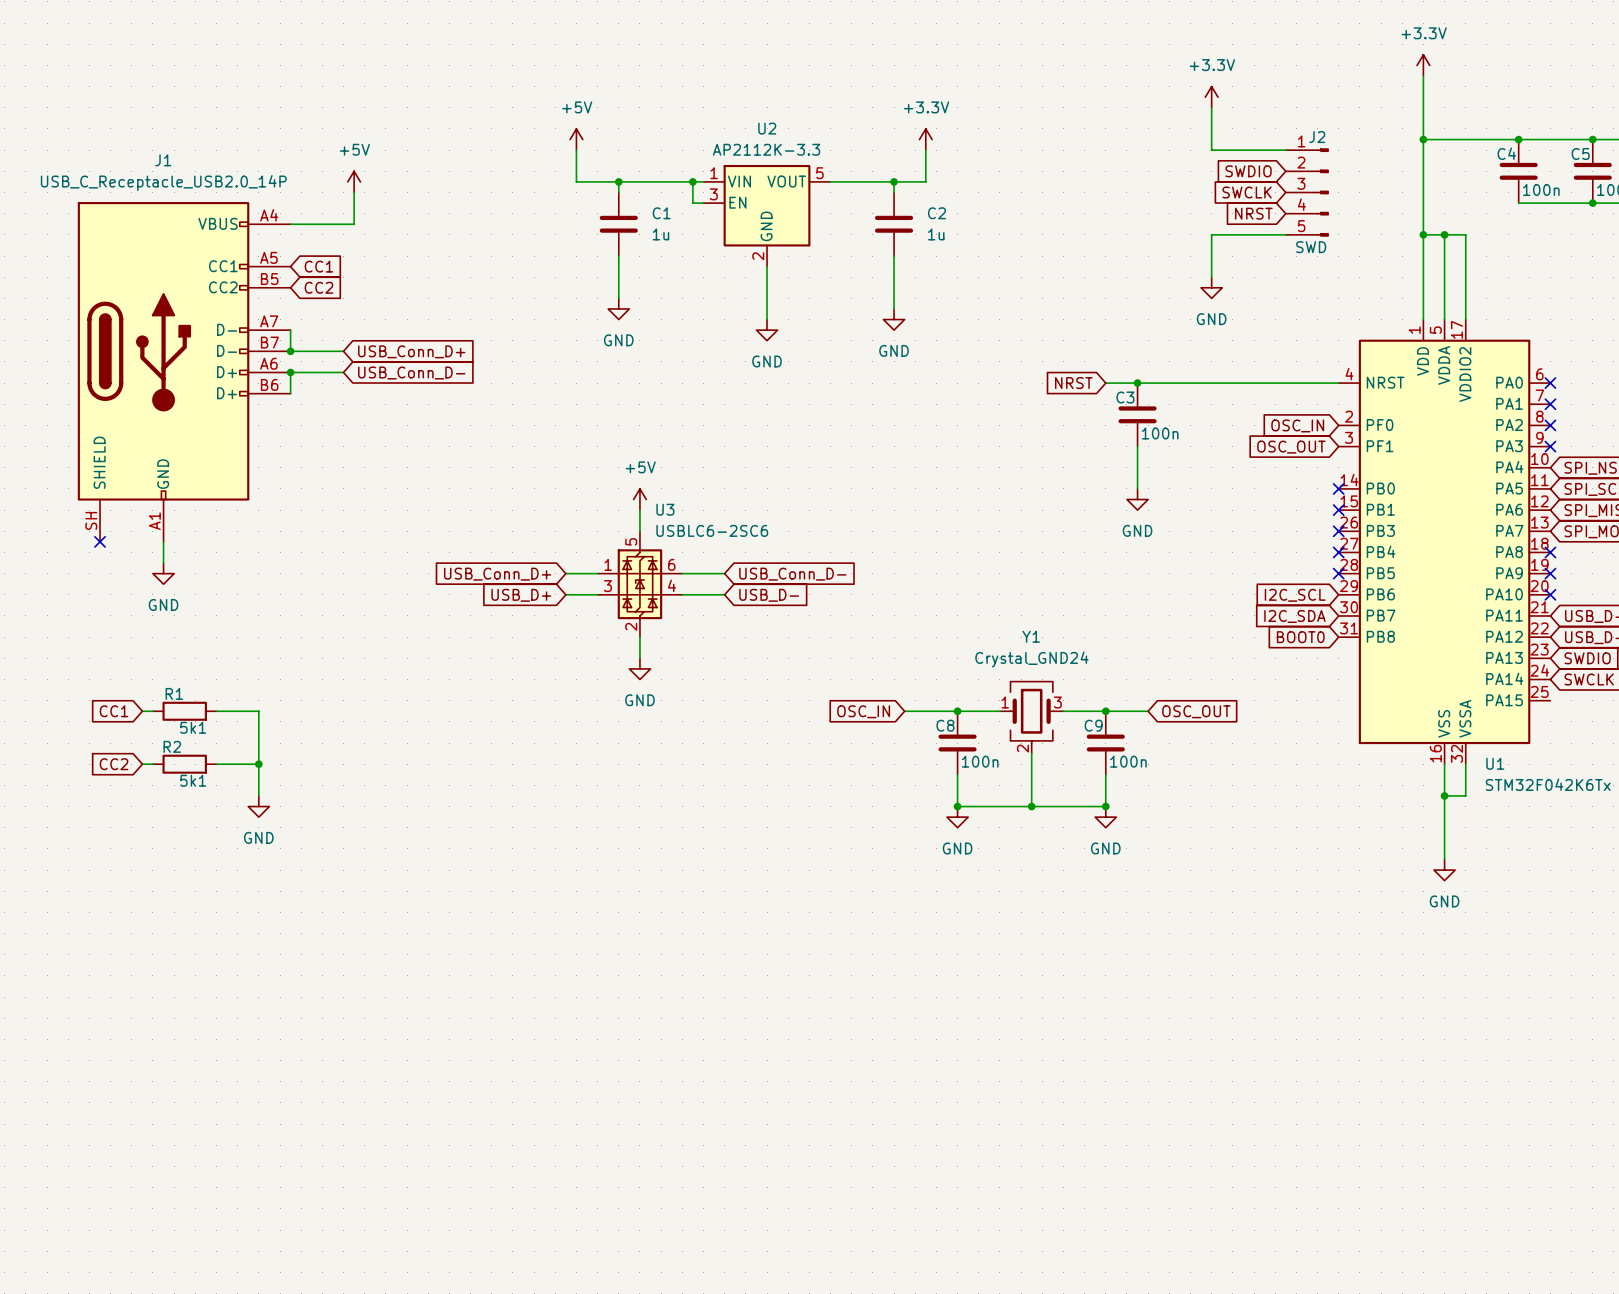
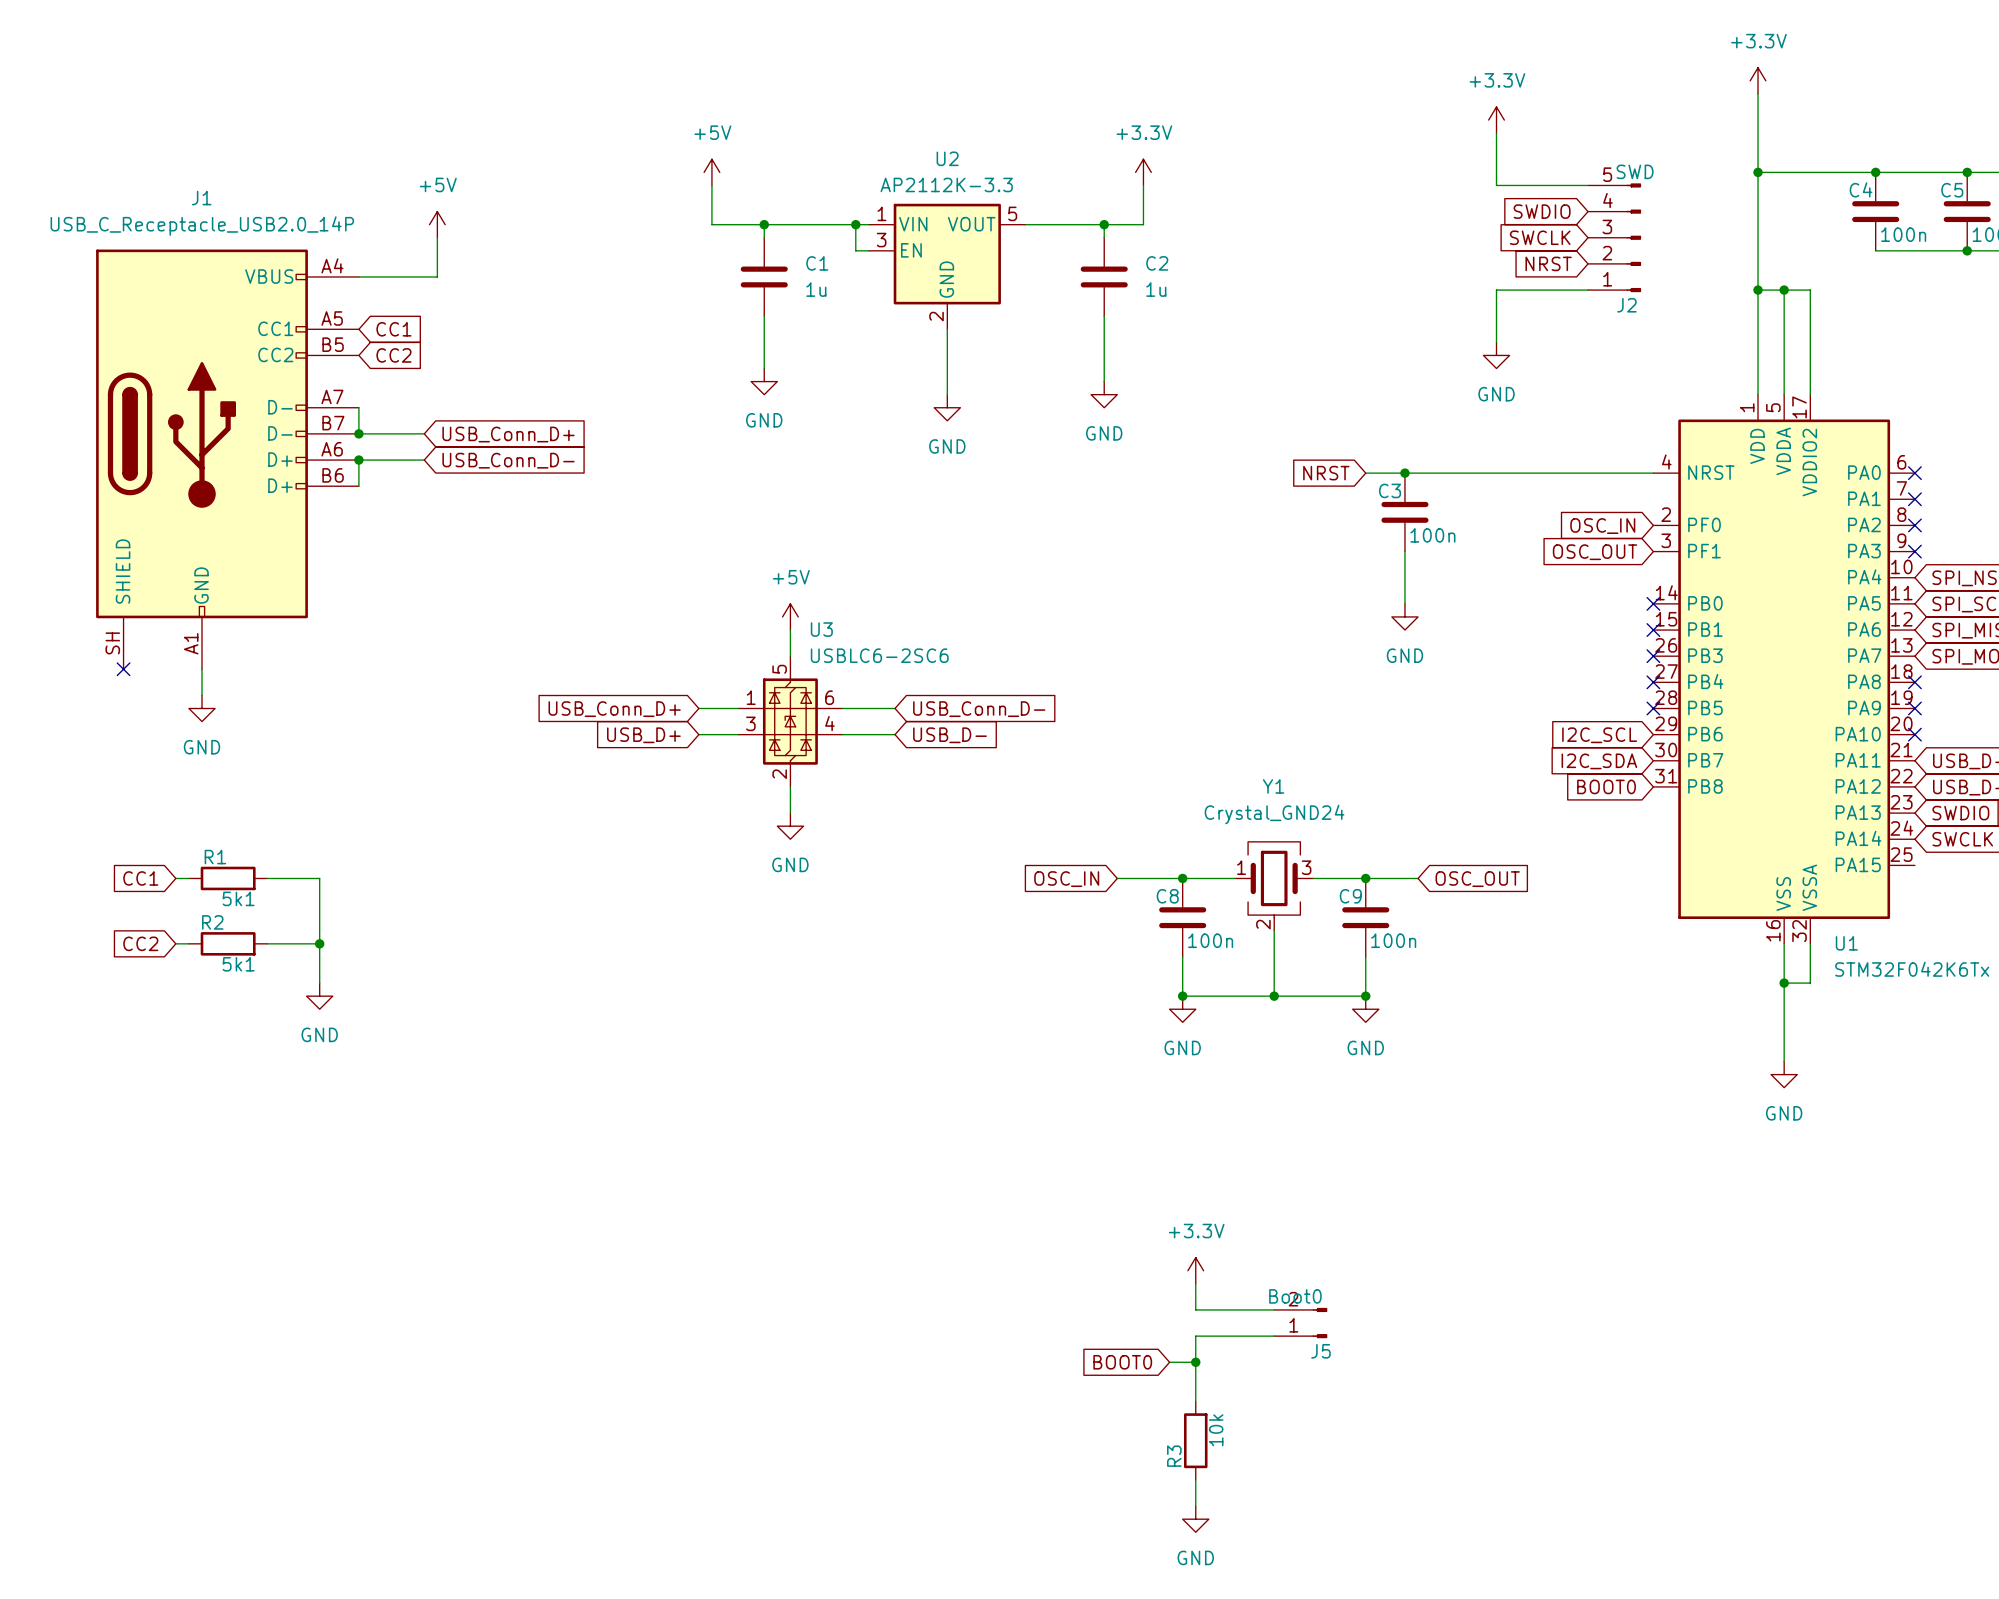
J2 flip: as is (1322, 192) -> up-down (1633, 237)
power symbol: none -> +3.3V (1195, 1270)
wire: none -> (1195, 1283) (1195, 1309) (1274, 1309)
J5: none -> Boot0 (1300, 1323)
wire: none -> (1274, 1336) (1195, 1336) (1195, 1401)
global label: none -> BOOT0 (1122, 1362)
wire: none -> (1169, 1362) (1195, 1362)
junction: none -> (1195, 1362)
R3: none -> 10k (1195, 1440)
wire: none -> (1195, 1479) (1195, 1506)
power symbol: none -> GND (1195, 1519)

